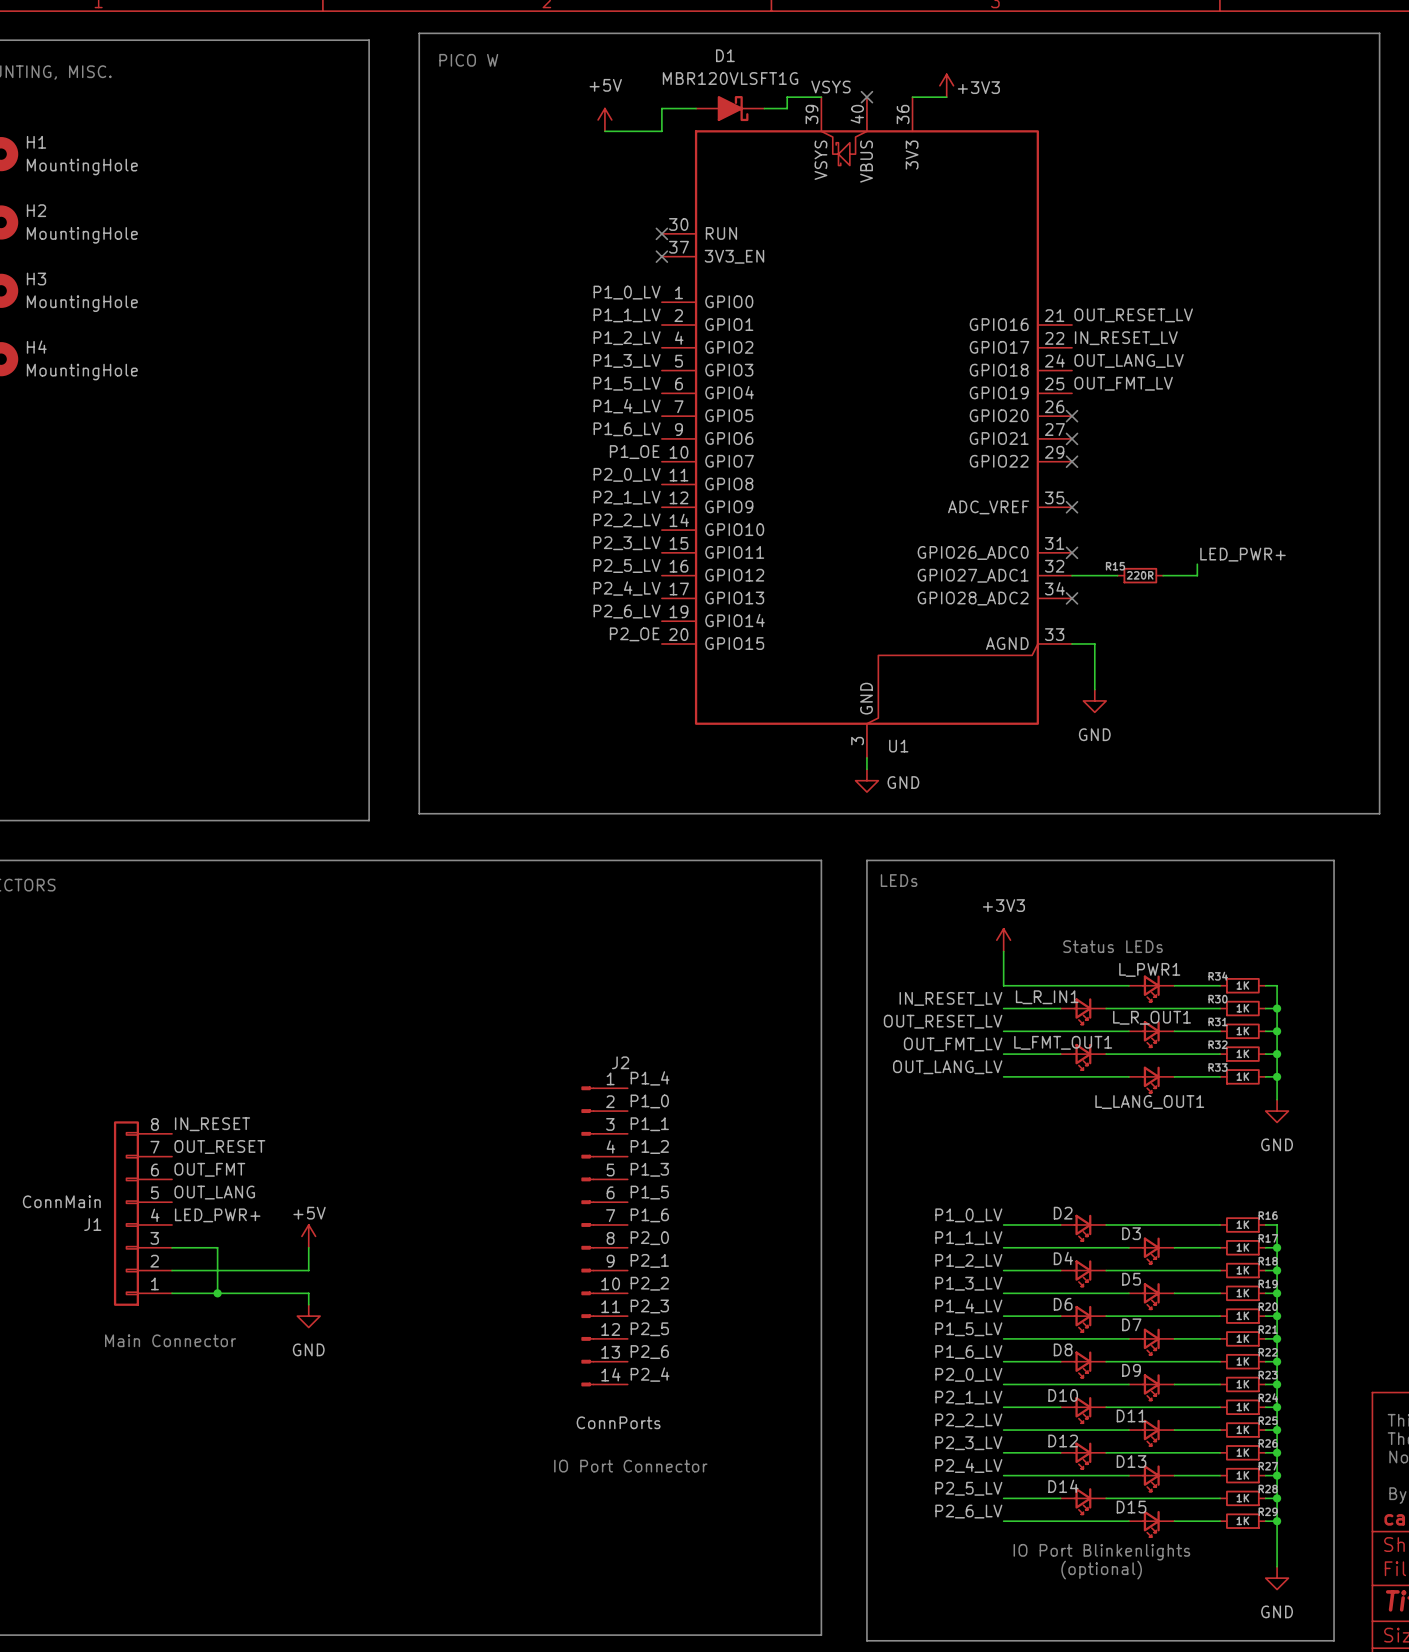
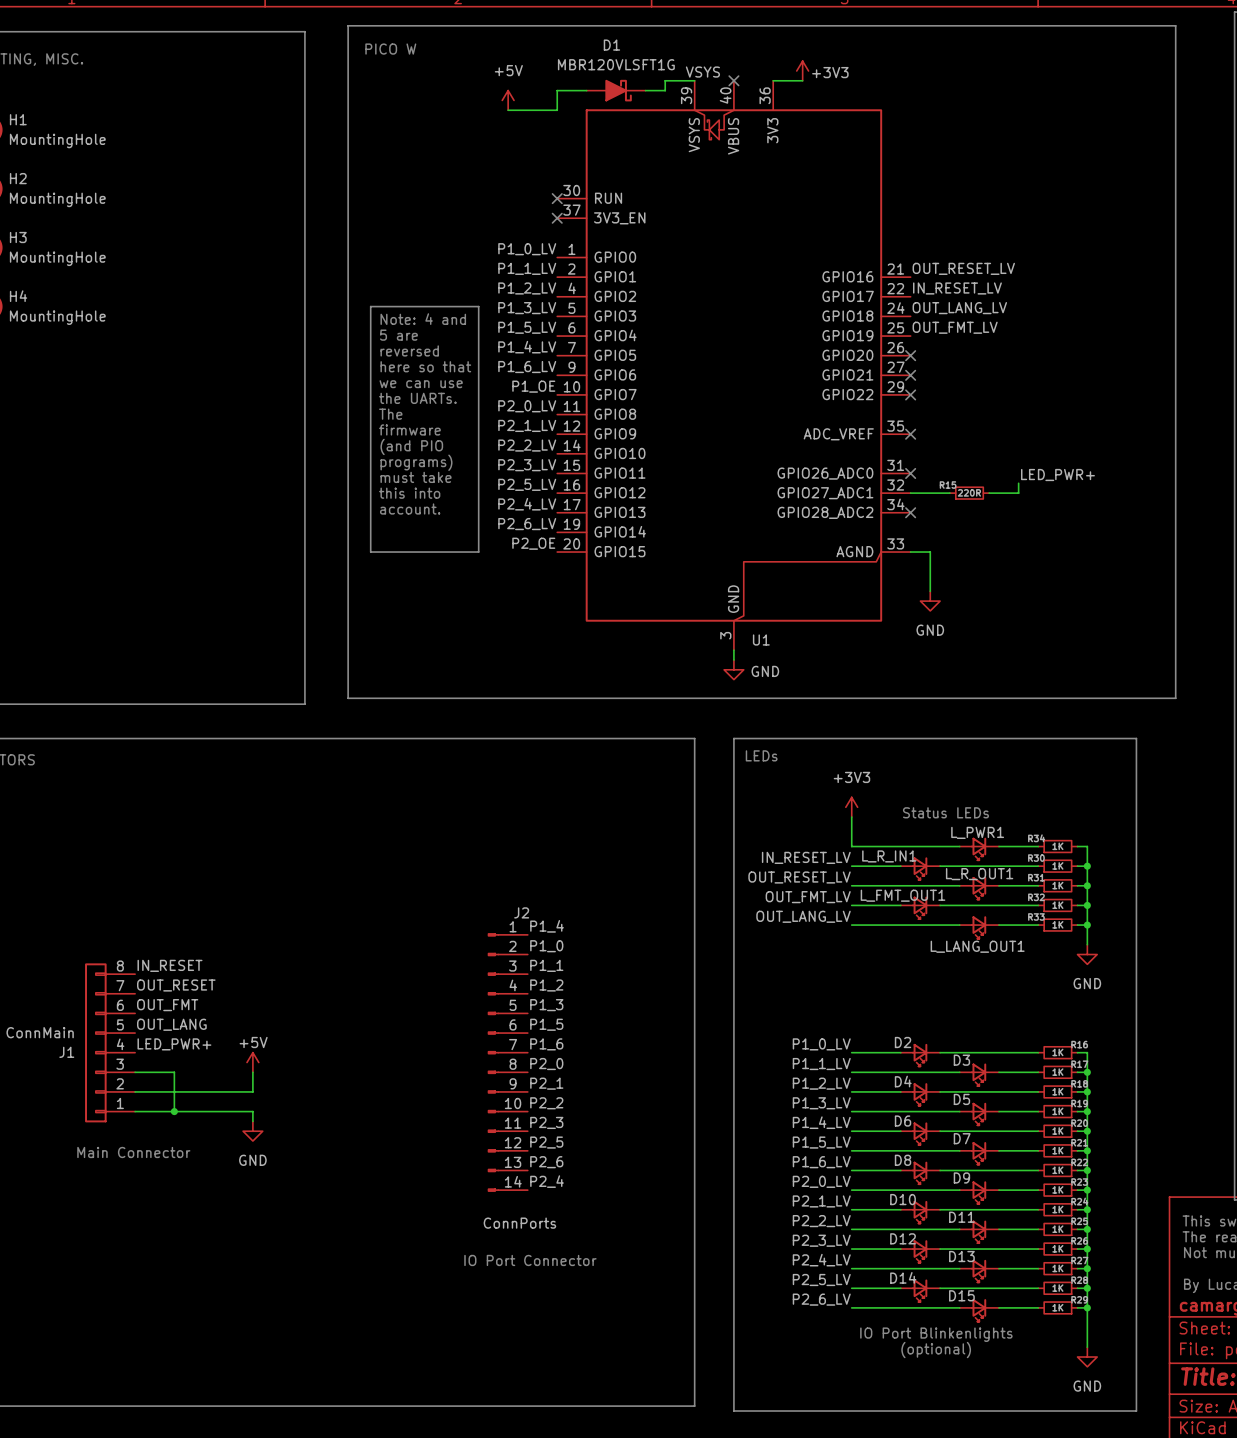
line: none -> (370, 306) (478, 306) (478, 552) (370, 552) (370, 306)
text: none -> Note: 4 and (423, 319)
text: none -> 5 are (398, 335)
text: none -> reversed (409, 350)
text: none -> here so that (425, 366)
text: none -> we can use (421, 384)
text: none -> the UARTs. (417, 398)
text: none -> The (390, 414)
text: none -> firmware (409, 429)
text: none -> (and PIO (411, 446)
text: none -> programs) (416, 462)
text: none -> must take (416, 477)
text: none -> this into (409, 493)
text: none -> account. (410, 508)

